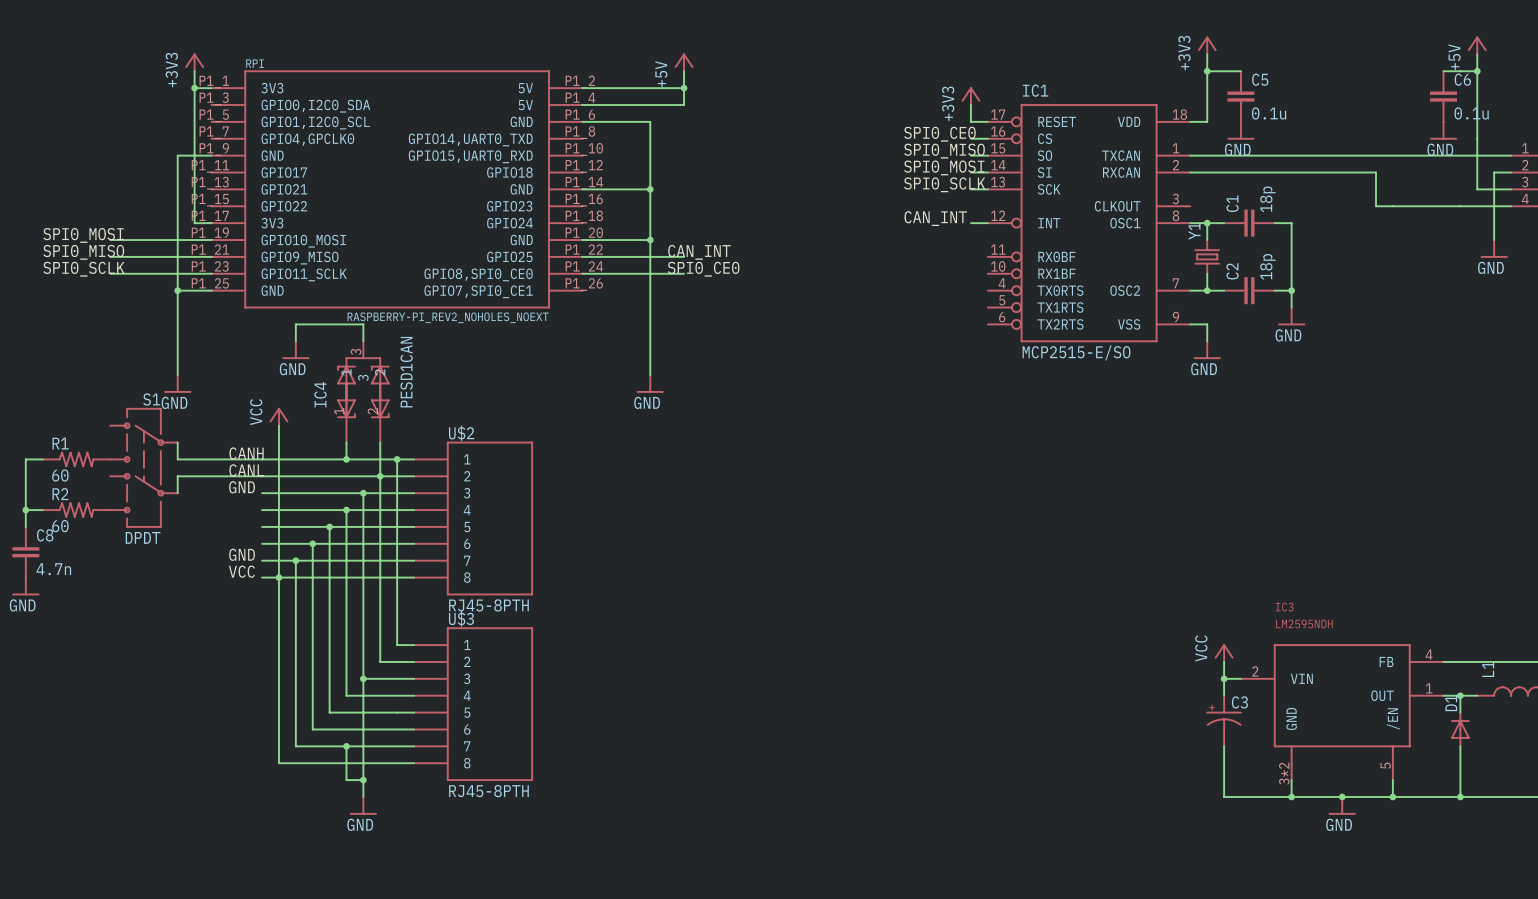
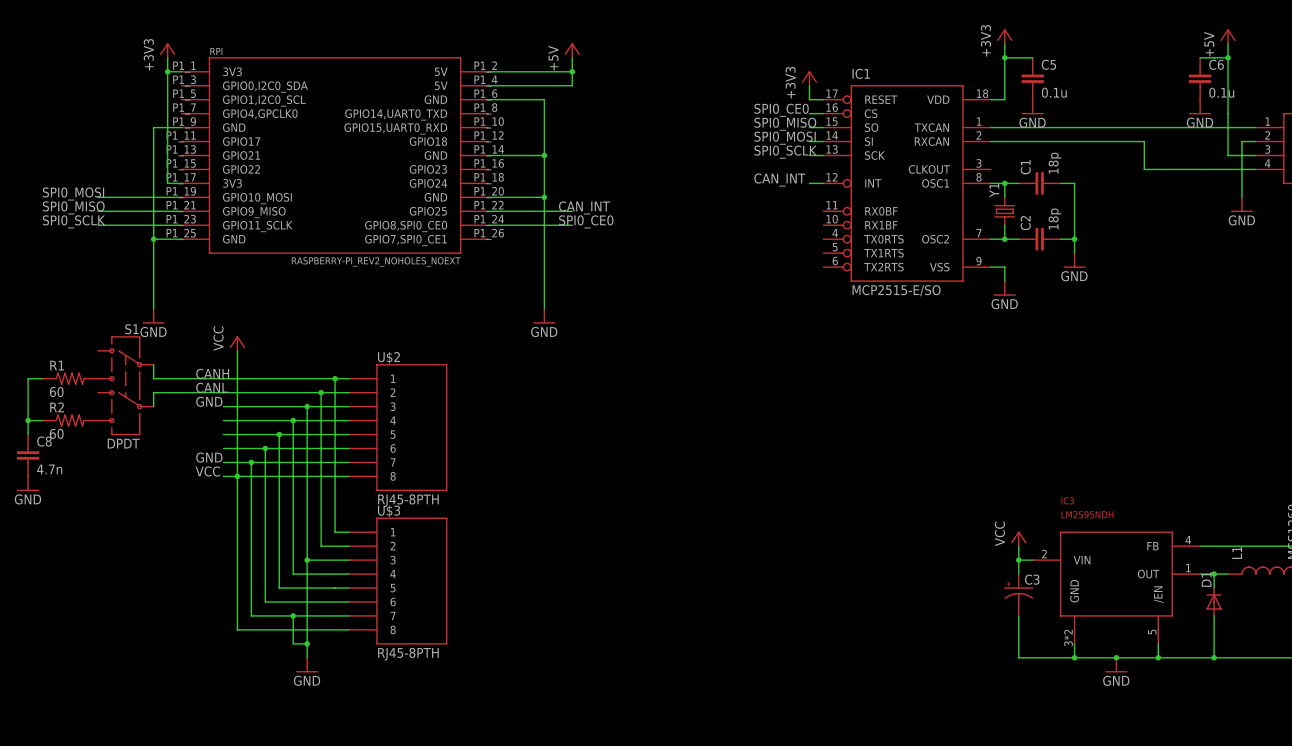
wire: (295, 341) (295, 324) (363, 324) (363, 341) -> none
power symbol: GND (295, 350) -> none
IC4: PESD1CAN (363, 391) -> none
wire: (346, 442) (346, 459) -> none
wire: (380, 442) (380, 476) -> none
junction: (346, 459) -> none

